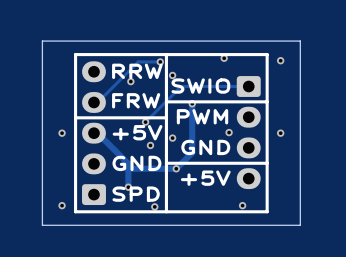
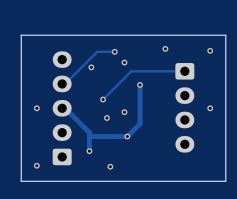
line: (166, 54) (166, 211) -> none
line: (267, 54) (75, 54) (75, 211) (267, 211) (267, 54) -> none
text: RRW (137, 71) -> none
text: SWIO (200, 86) -> none
text: FRW (136, 100) -> none
line: (267, 101) (166, 101) -> none
text: PWM (202, 116) -> none
line: (166, 117) (75, 117) -> none
text: +5V (137, 132) -> none
via: (229, 132) -> none
text: GND (205, 147) -> none
text: GND (136, 163) -> none
line: (267, 163) (166, 163) -> none
text: +5V (205, 178) -> none
text: SPD (136, 194) -> none
via: (242, 205) -> none

